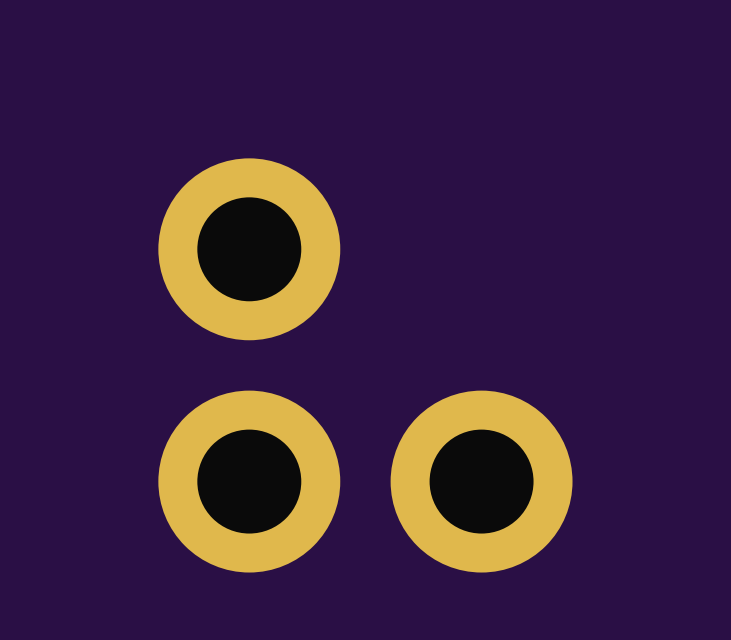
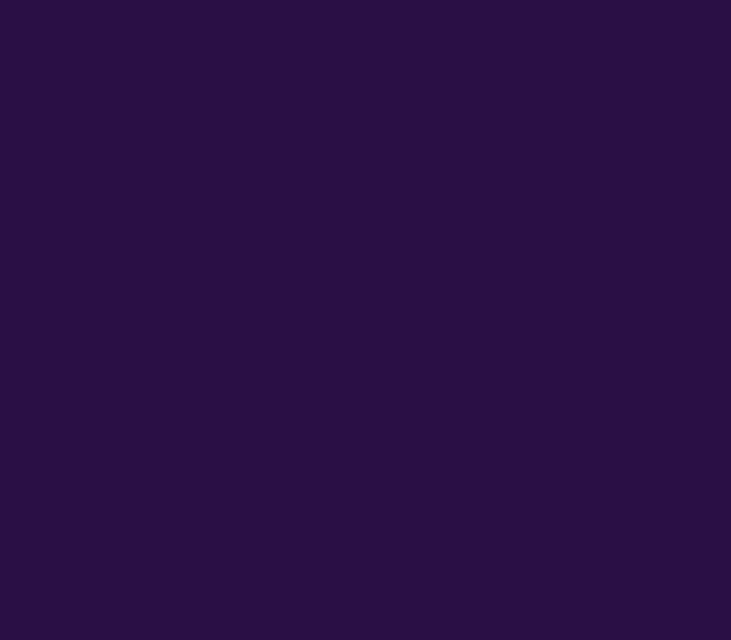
part: (249, 249) -> none
part: (249, 481) -> none
part: (481, 481) -> none

